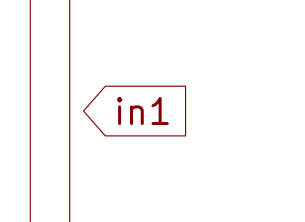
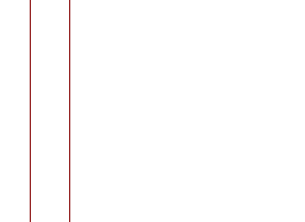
global label: in1 (142, 111) -> none

